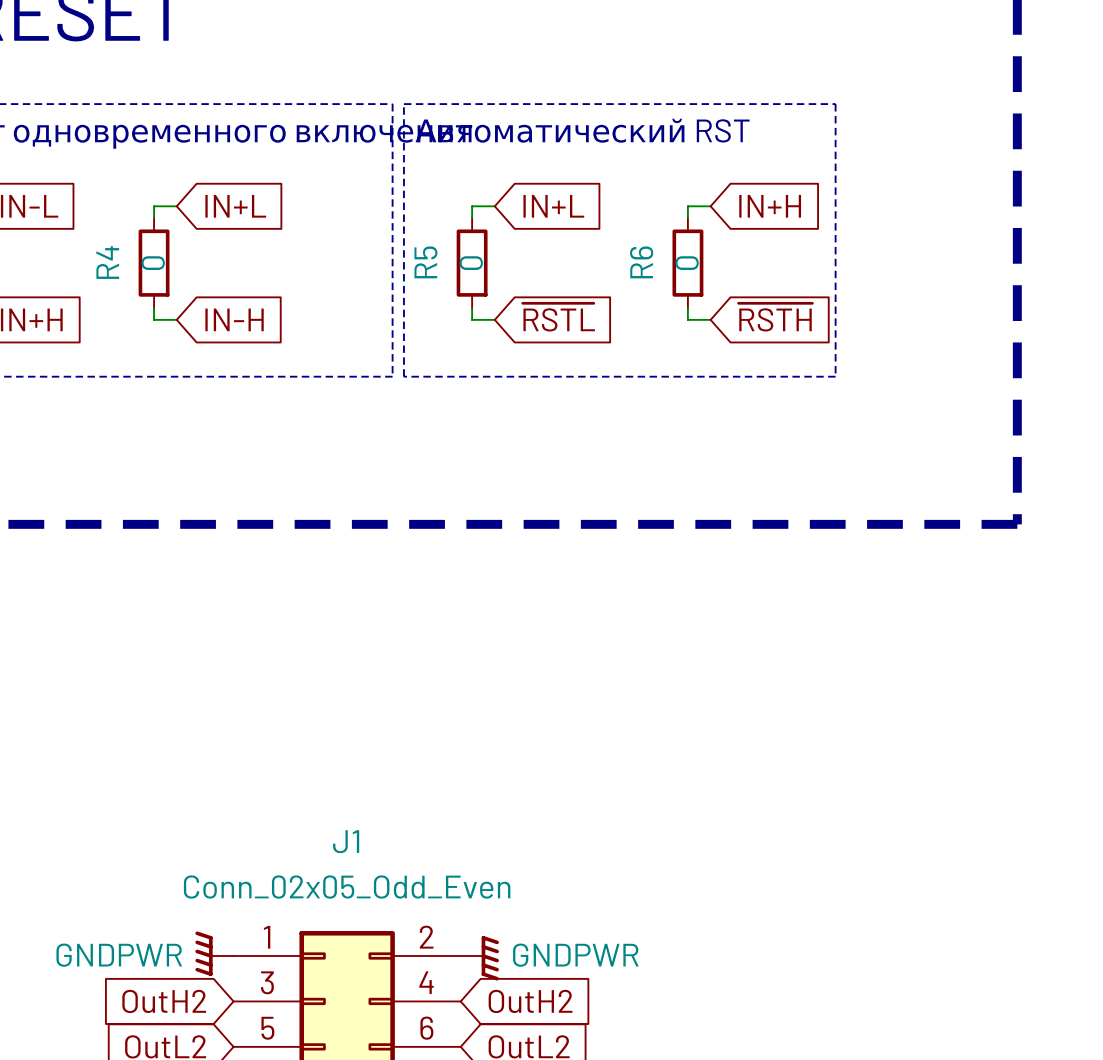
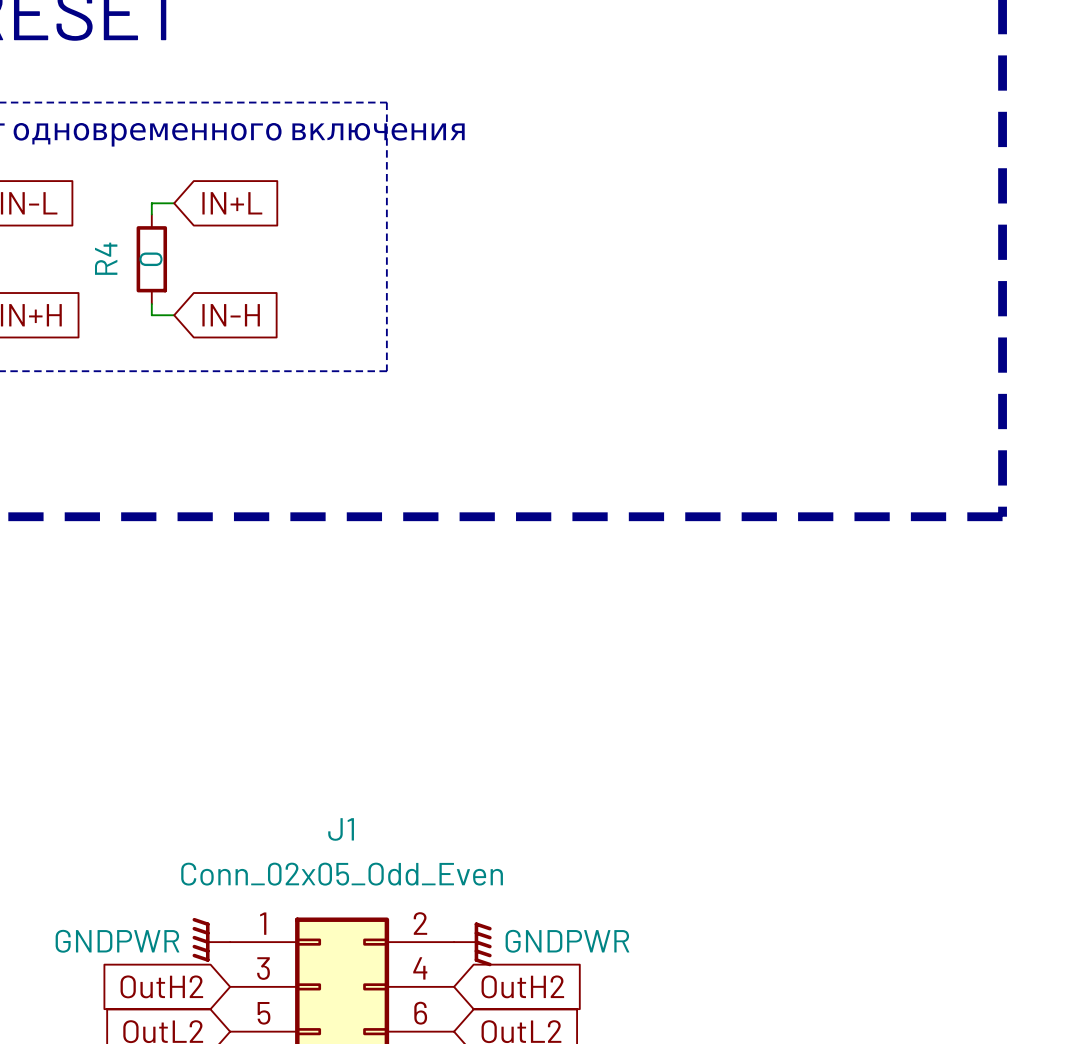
line: (403, 104) (835, 104) (835, 376) (403, 376) (403, 104) -> none
text: Автоматический RST (582, 130) -> none
wire: (494, 206) (472, 206) (472, 217) -> none
global label: IN+L (553, 206) -> none
wire: (710, 206) (687, 206) (687, 217) -> none
global label: IN+H (770, 206) -> none
R5: 0 (472, 263) -> none
R6: 0 (687, 263) -> none
wire: (472, 308) (472, 319) (494, 319) -> none
wire: (687, 308) (687, 319) (710, 319) -> none
global label: ~{RSTL} (558, 317) -> none
global label: ~{RSTH} (775, 317) -> none

